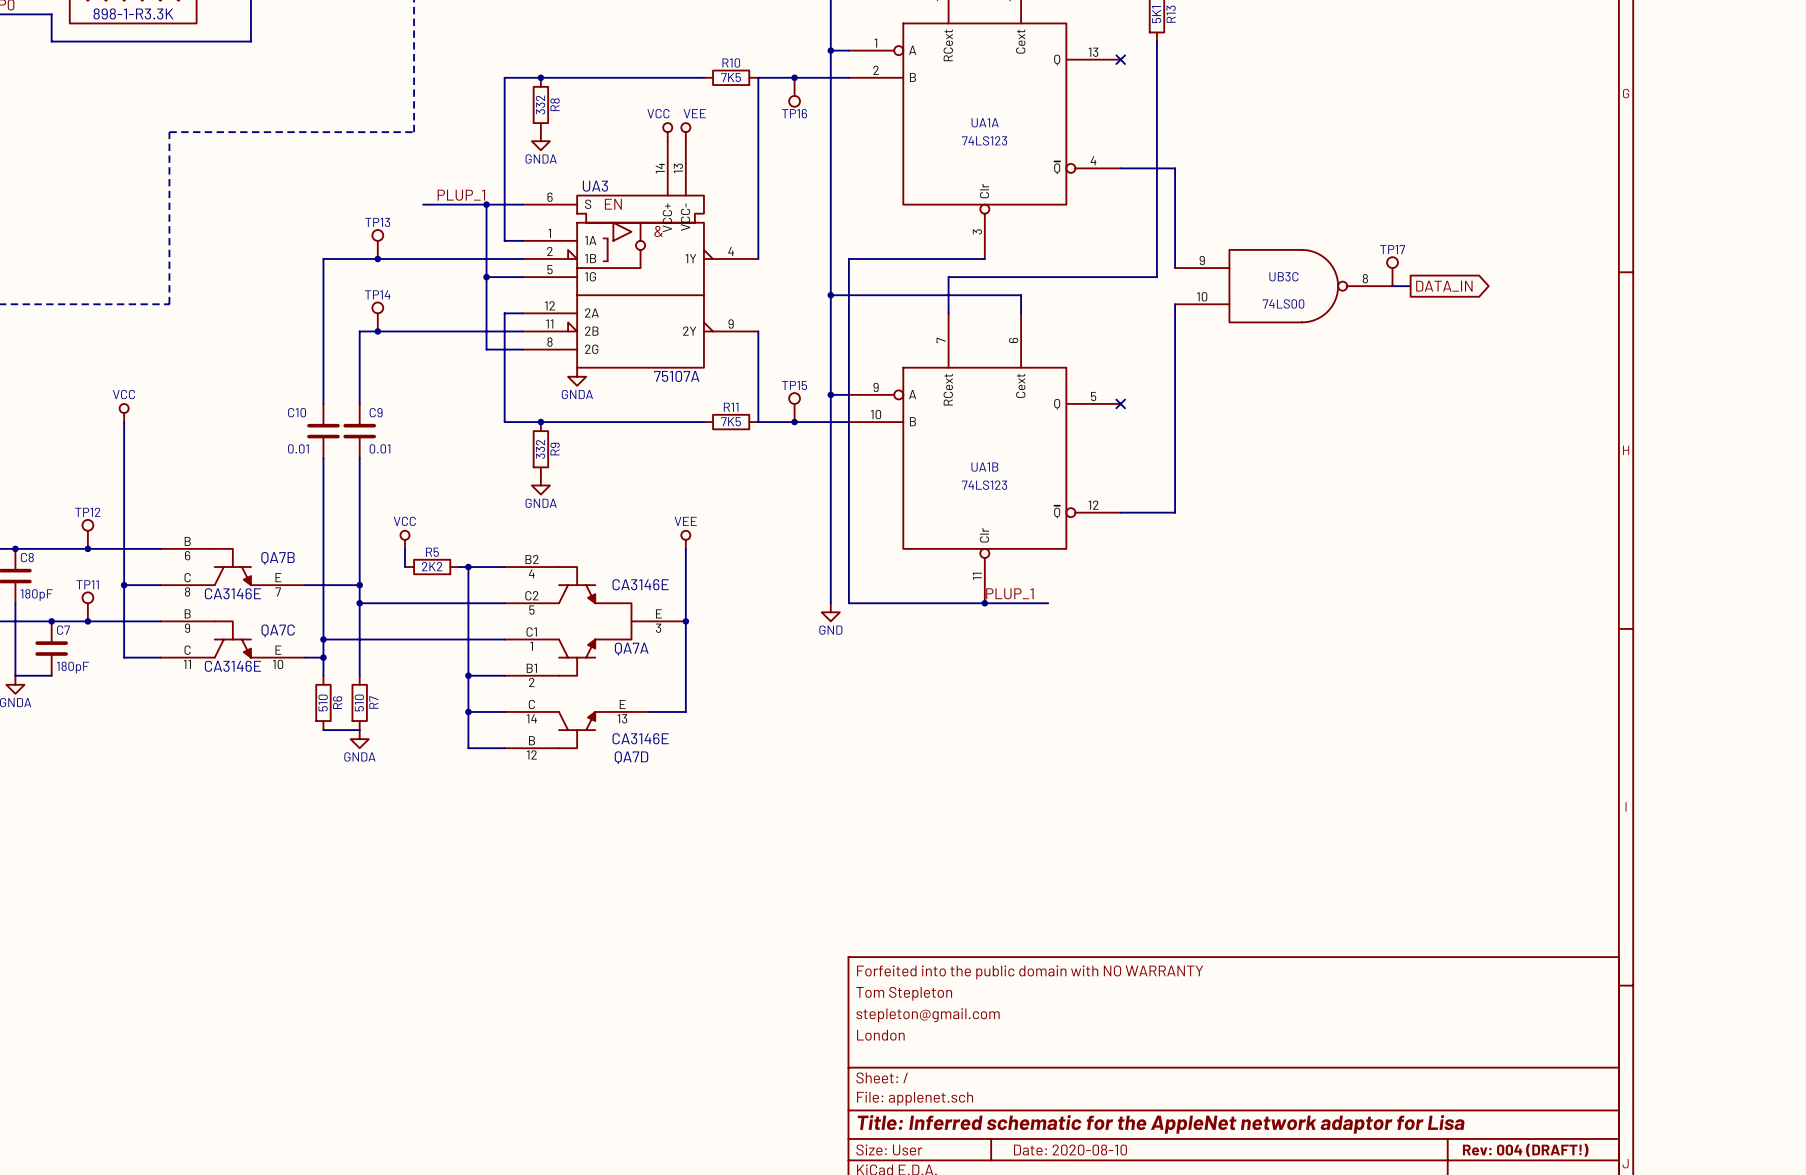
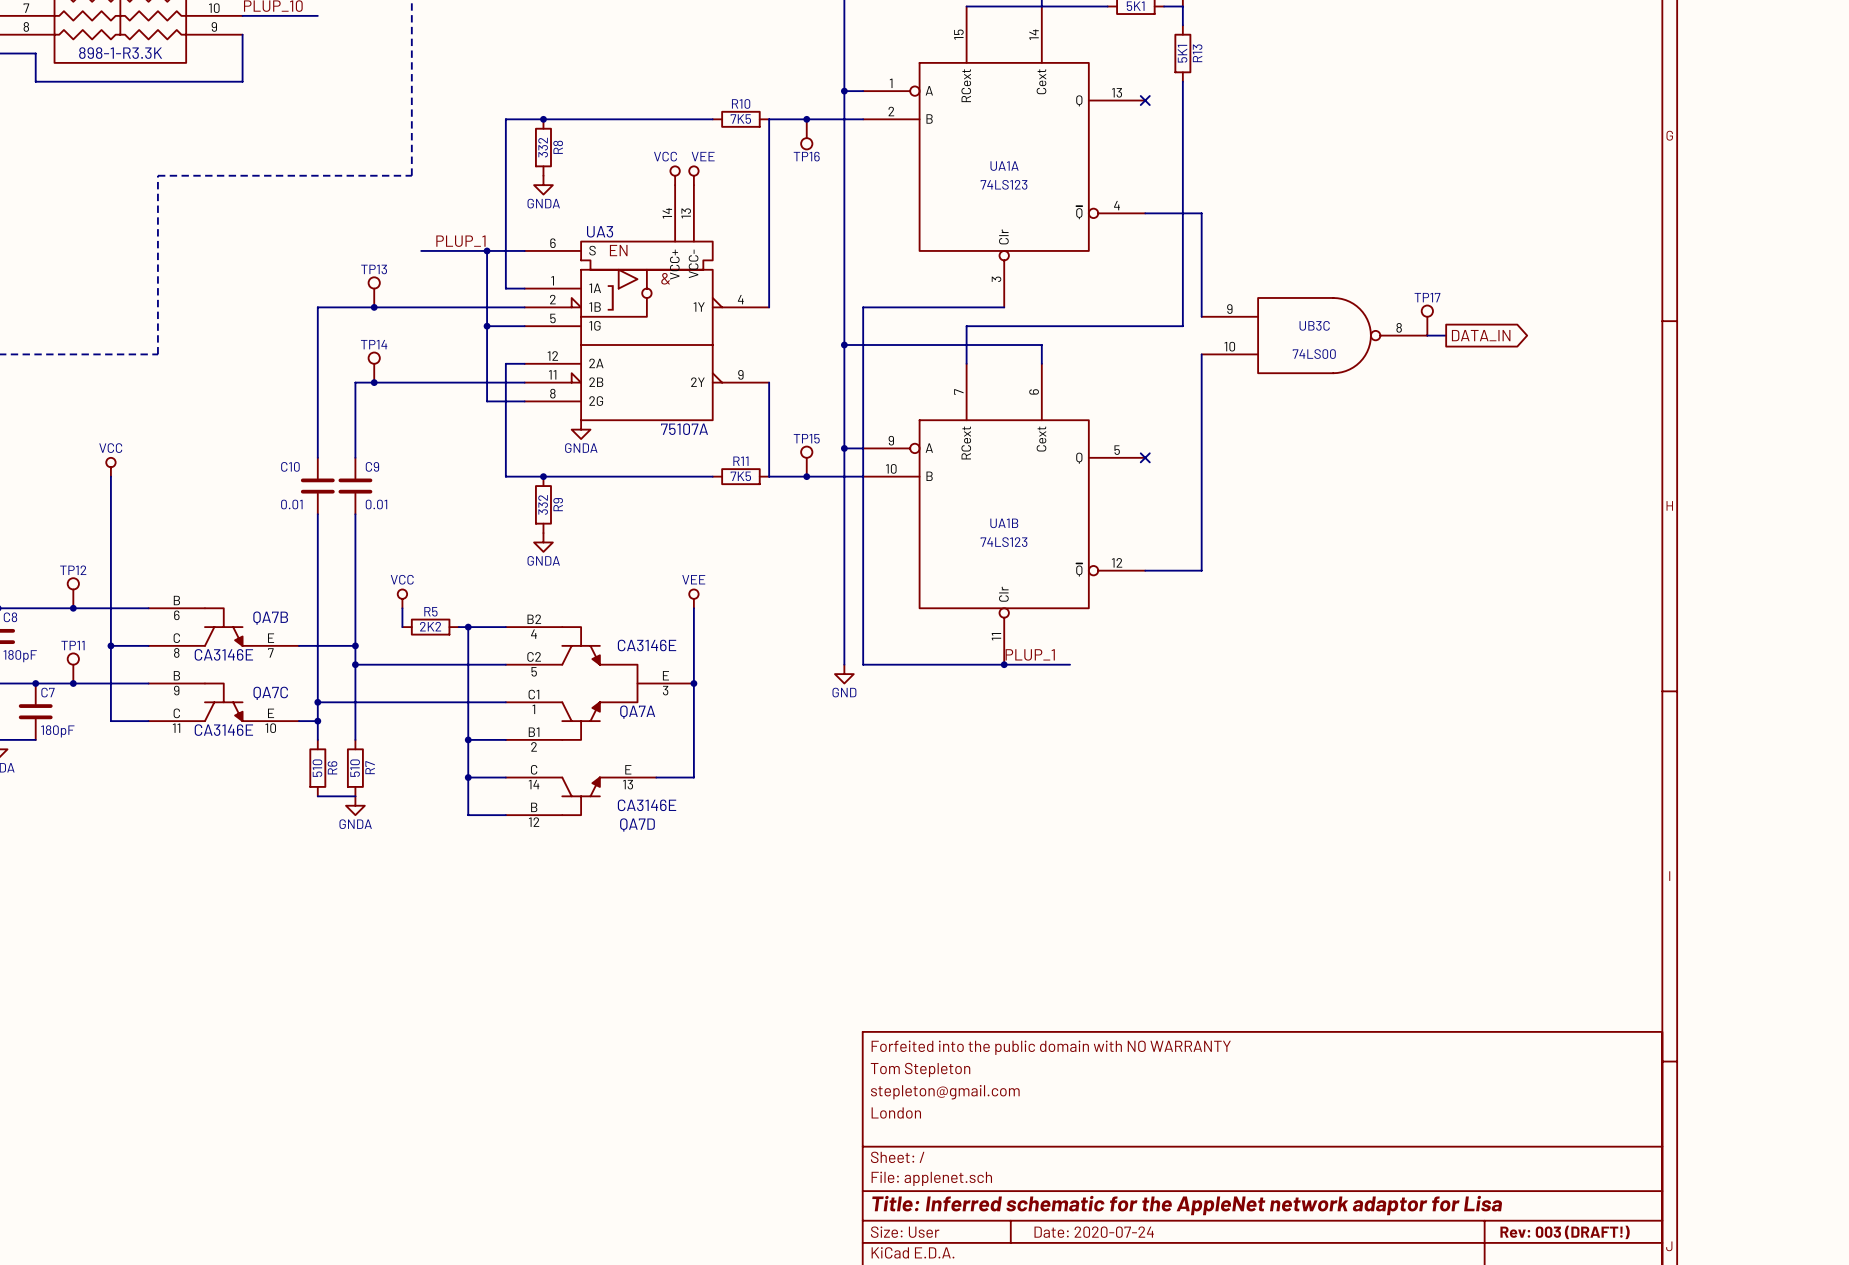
title block: Date: 2020-08-10 (1070, 1150) -> Date: 2020-07-24 (1094, 1232)
title block: Rev: 004 (DRAFT!) (1525, 1150) -> Rev: 003 (DRAFT!) (1565, 1232)

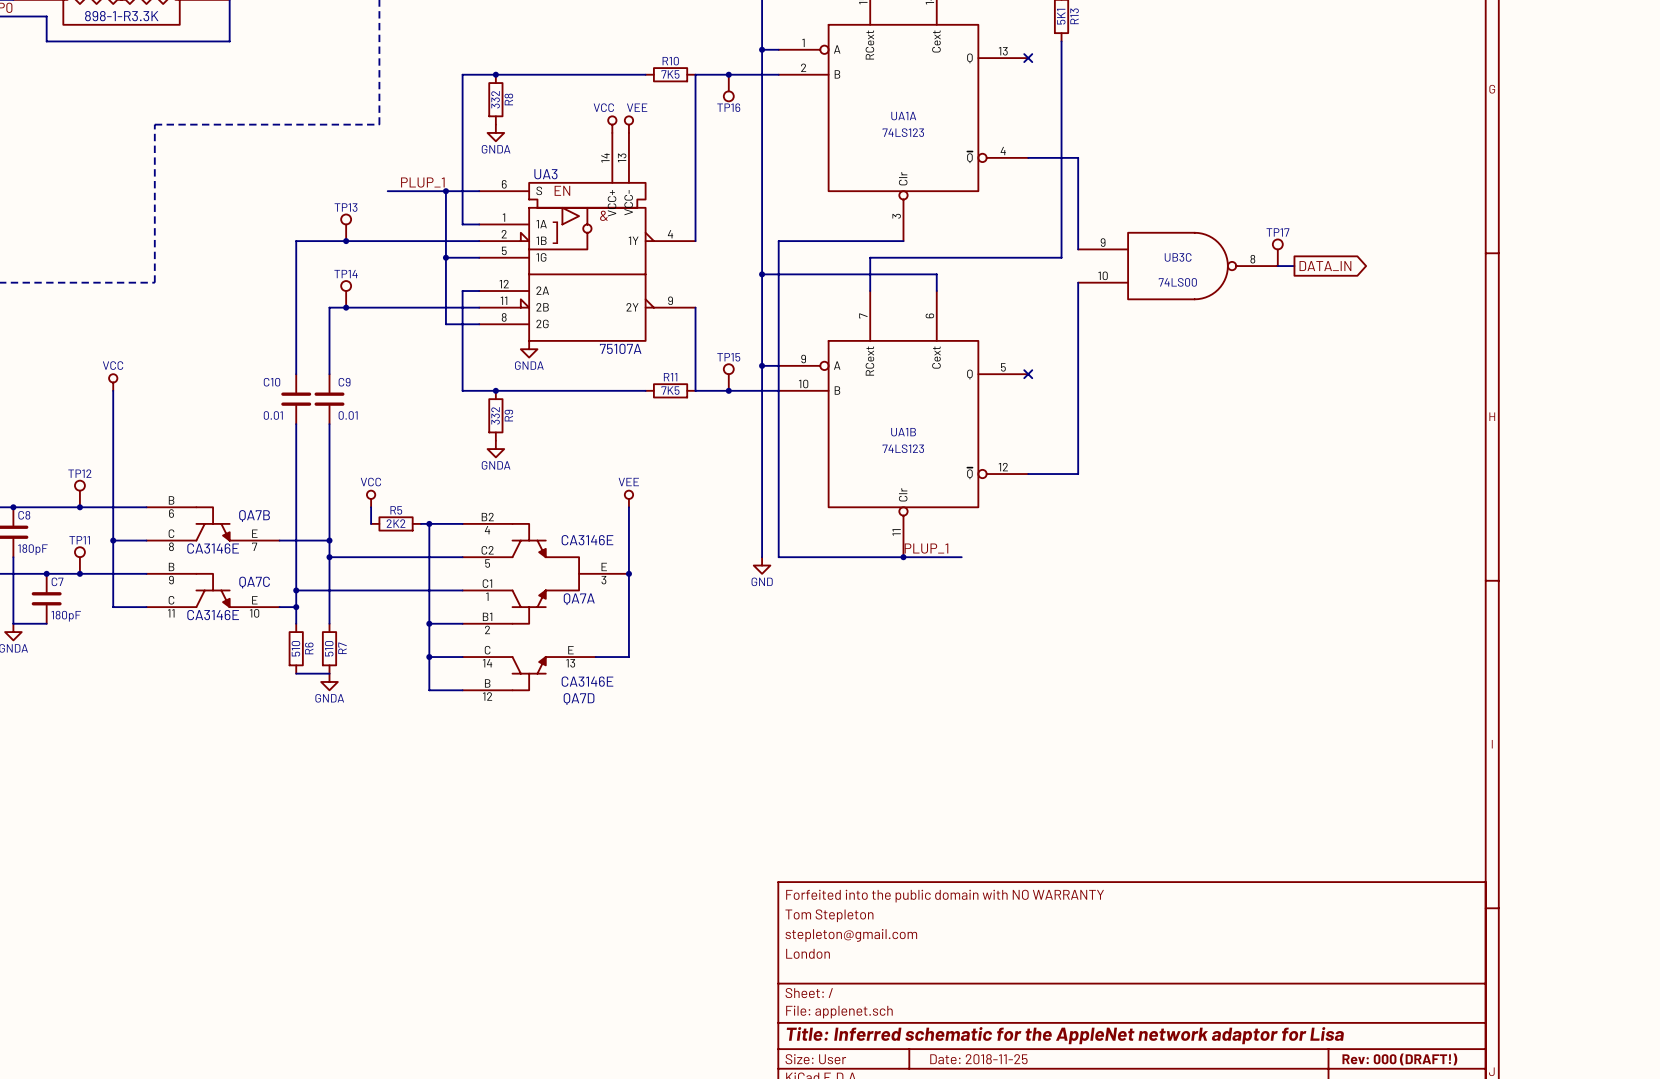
title block: Date: 2020-07-24 (1094, 1232) -> Date: 2018-11-25 (978, 1059)
title block: Rev: 003 (DRAFT!) (1565, 1232) -> Rev: 000 (DRAFT!) (1399, 1059)

